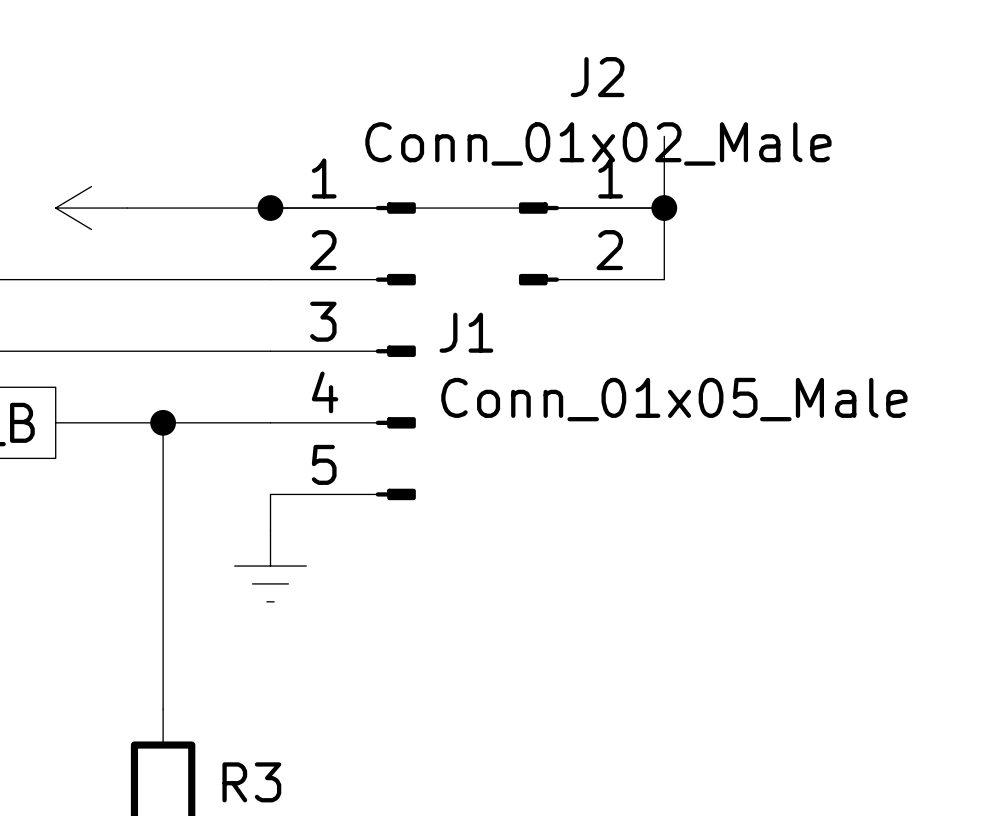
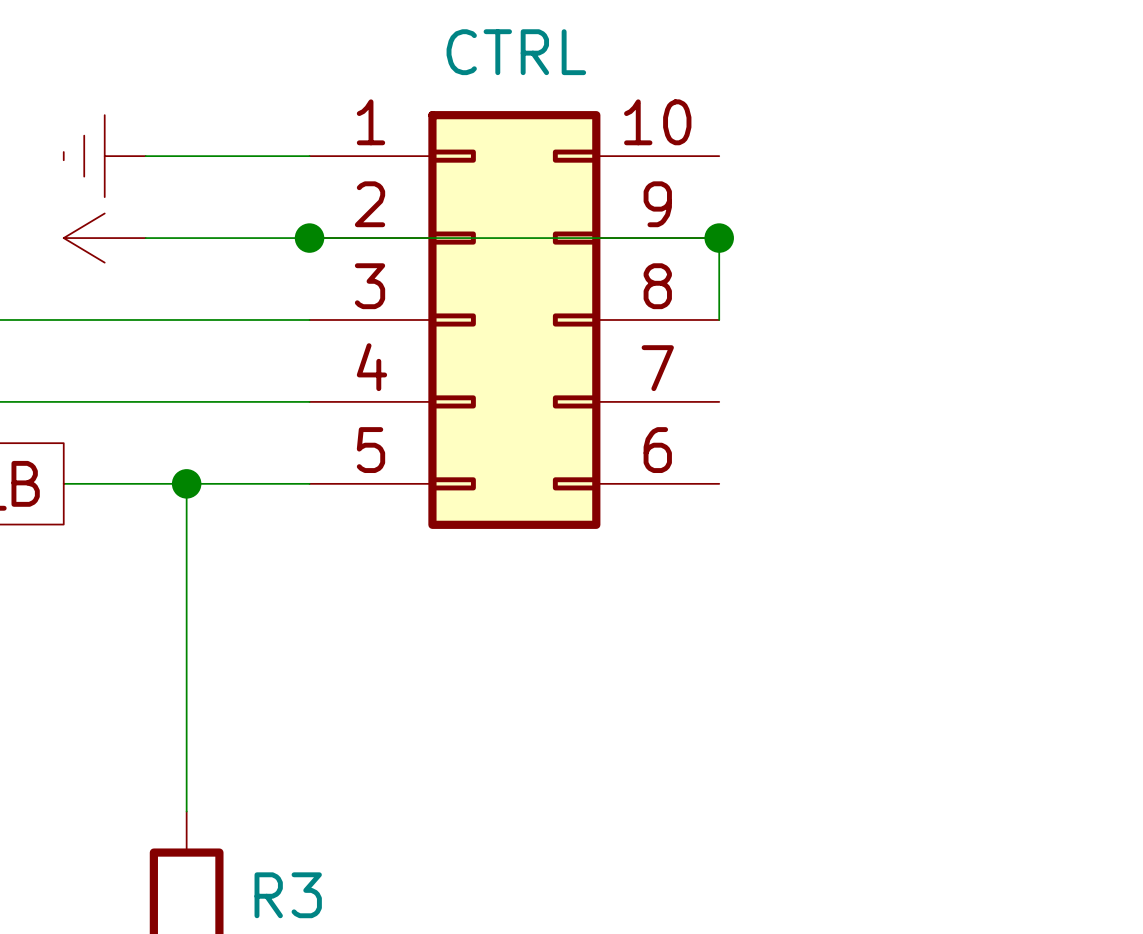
wire: none -> (145, 156) (309, 156)
wire: (664, 136) (664, 279) -> none
wire: (628, 208) (664, 208) -> (719, 238) (719, 319)
junction position: (664, 208) -> (719, 238)
J2: Conn_01x02_Male (591, 243) -> none
part: none -> CTRL (514, 319)
J1: Conn_01x05_Male (343, 351) -> none
wire: (270, 494) (270, 530) -> none
power symbol rotation: 0° (270, 566) -> 90° clockwise (104, 156)
power symbol position: (270, 566) -> (104, 156)

